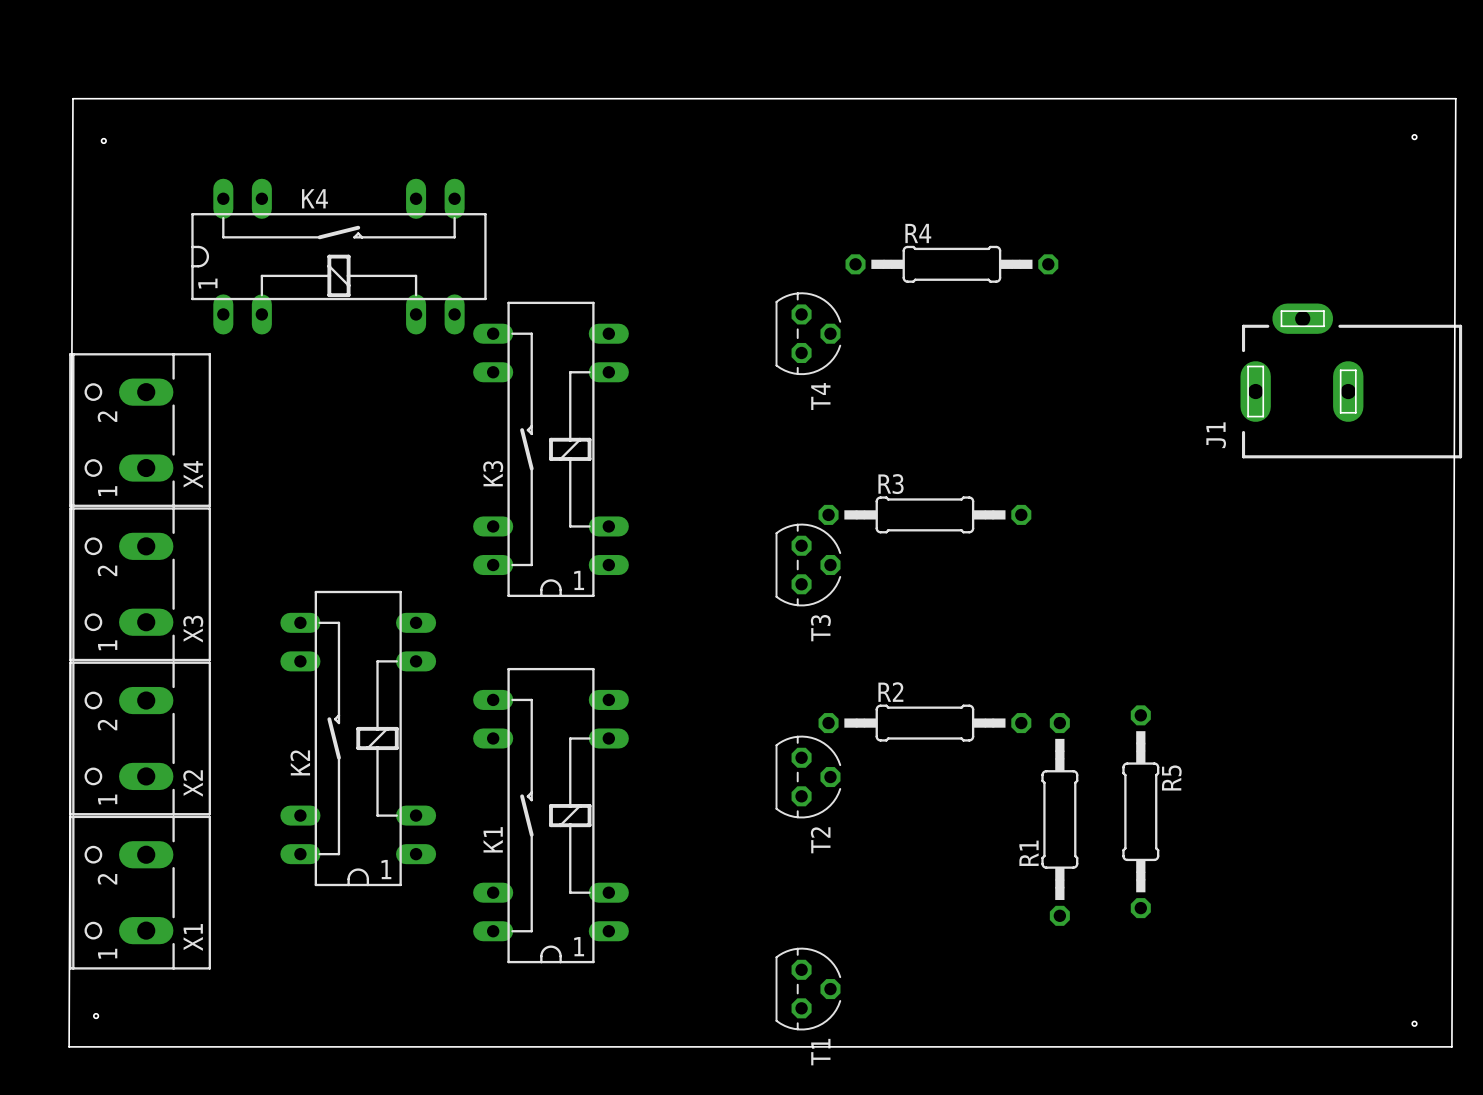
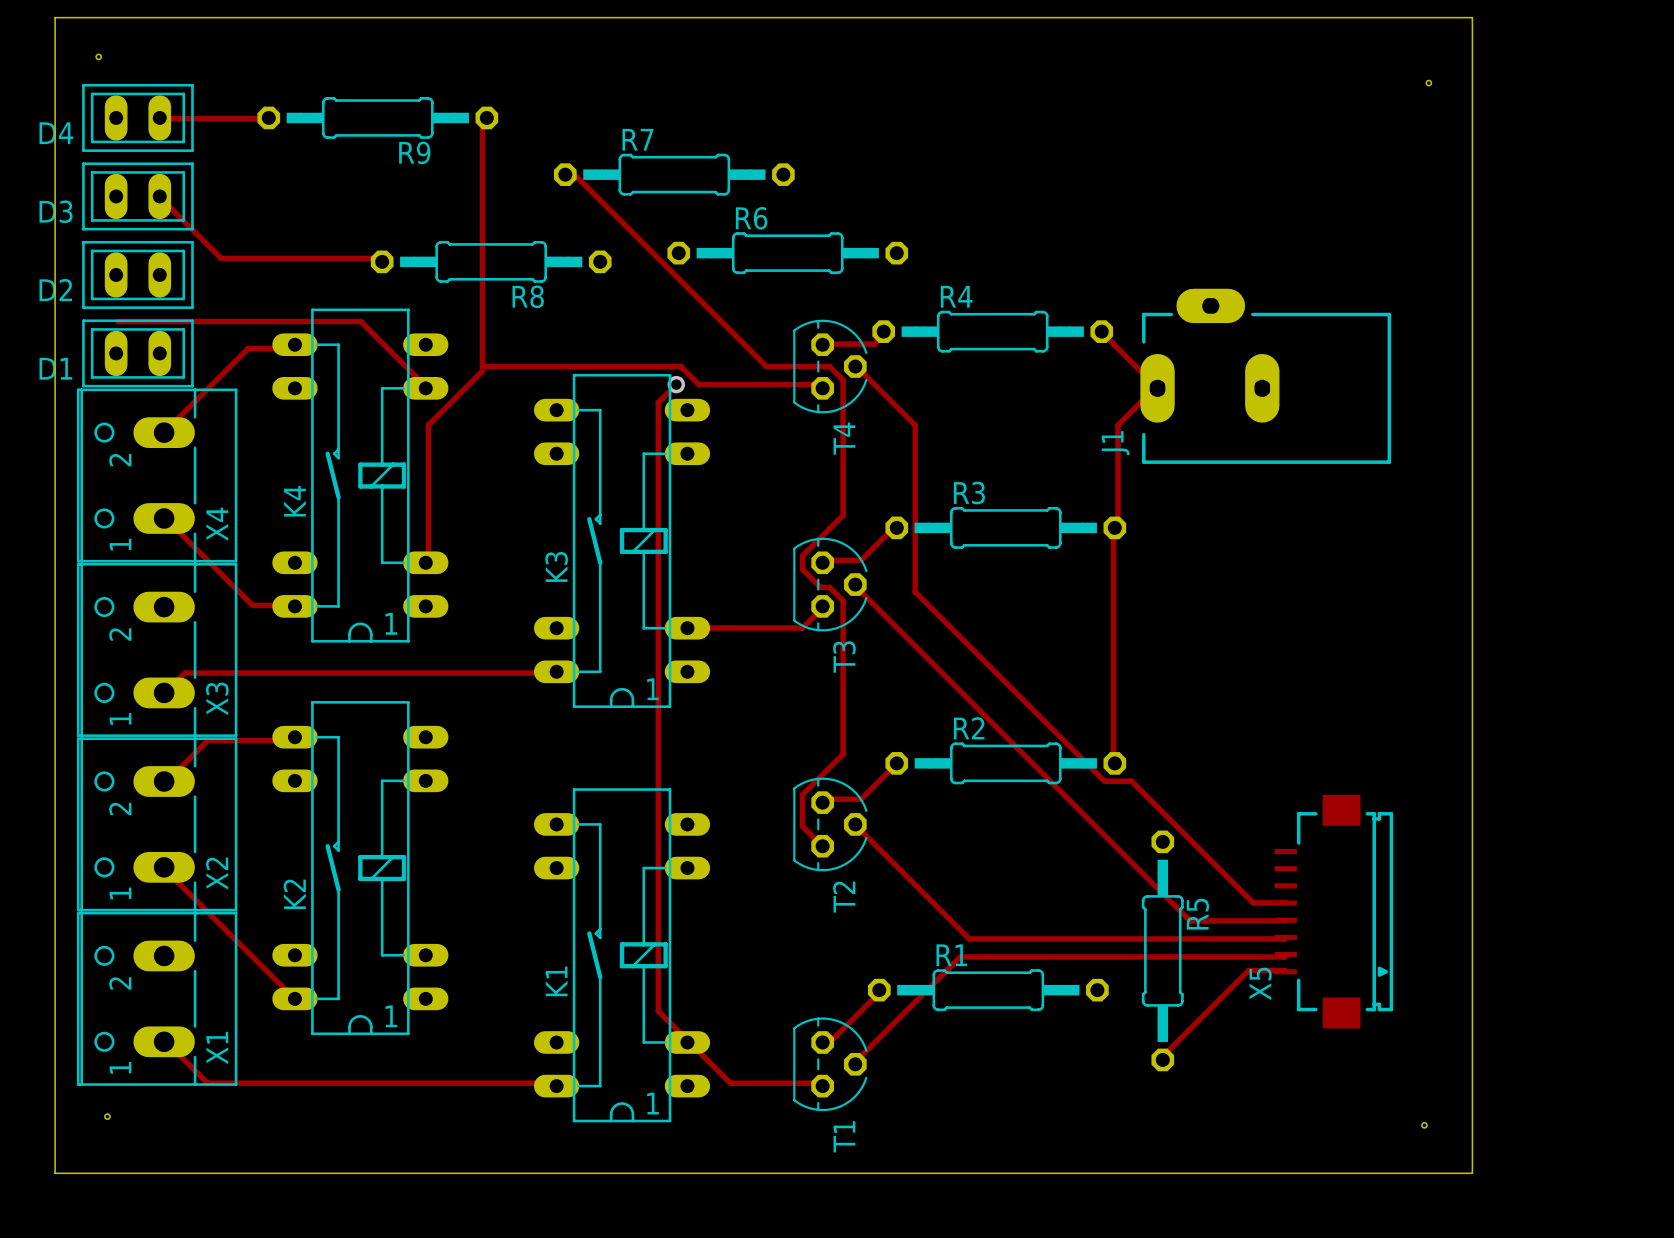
D4: none -> (137, 117)
track: none -> (159, 117) (268, 117)
R9: none -> (377, 117)
track: none -> (486, 117) (482, 118) (482, 371) (428, 425) (428, 560) (425, 562)
hole position: (1414, 137) -> (1428, 83)
hole position: (103, 140) -> (98, 56)
track: none -> (565, 174) (568, 177) (577, 177) (766, 366) (829, 366) (843, 380) (843, 515) (802, 555) (802, 569) (820, 587) (829, 587) (843, 600) (843, 754) (802, 794) (802, 826) (822, 846)
R7: none -> (674, 174)
K4 footprint: [191, 178, 487, 335] -> [272, 308, 449, 643]
D3: none -> (137, 196)
track: none -> (159, 196) (221, 258) (378, 258) (382, 261)
K4 name position: K4 (314, 198) -> K4 (294, 501)
R6: none -> (787, 253)
R8: none -> (491, 261)
D2: none -> (137, 274)
R4 position: (951, 264) -> (992, 331)
track: none -> (117, 321) (360, 321) (425, 388)
track: none -> (883, 331) (883, 335) (874, 344) (822, 344)
track: none -> (1101, 331) (1157, 388) (1154, 389) (1118, 425) (1118, 524) (1113, 528) (1114, 763)
track: none -> (294, 344) (293, 348) (248, 348) (164, 432)
D1: none -> (137, 353)
track: none -> (482, 366) (680, 366) (698, 384) (820, 384) (822, 388)
track: none -> (855, 366) (915, 425) (915, 591) (1104, 781) (1131, 781) (1253, 902) (1285, 903)
T4 position: (808, 333) -> (830, 366)
track: none -> (676, 384) (658, 402) (658, 1011) (687, 1042) (689, 1042) (730, 1083) (820, 1083) (822, 1086)
via: none -> (676, 384)
J1 position: (1351, 380) -> (1265, 376)
K3 position: (550, 449) -> (622, 540)
track: none -> (164, 518) (252, 605) (294, 606)
track: none -> (896, 527) (892, 528) (861, 560) (825, 560) (822, 562)
R3 position: (924, 514) -> (1005, 527)
track: none -> (855, 584) (1190, 920) (1285, 920)
track: none -> (822, 606) (802, 627) (687, 628)
T3 position: (808, 564) -> (830, 584)
track: none -> (556, 671) (185, 673) (164, 692)
track: none -> (294, 737) (293, 740) (207, 740) (167, 781) (164, 781)
track: none -> (896, 763) (861, 799) (825, 799) (822, 802)
R2 position: (924, 723) -> (1005, 763)
K2 position: (358, 738) -> (360, 868)
track: none -> (855, 824) (969, 938) (1284, 938) (1285, 937)
track: none -> (164, 867) (294, 998)
T2 position: (808, 777) -> (830, 824)
R5 position: (1140, 811) -> (1162, 950)
K1 position: (550, 815) -> (622, 955)
X5: none -> (1333, 911)
R1 rotation: 0° (1059, 819) -> 90° clockwise (988, 990)
R1 position: (1059, 819) -> (988, 990)
track: none -> (1285, 954) (1284, 956) (960, 956) (856, 1060) (855, 1064)
track: none -> (1285, 971) (1248, 970) (1163, 1056) (1162, 1059)
track: none -> (879, 990) (879, 993) (834, 1038) (825, 1038) (822, 1042)
track: none -> (164, 1041) (207, 1083) (554, 1083) (556, 1086)
T1 position: (808, 989) -> (830, 1064)
hole position: (96, 1016) -> (107, 1116)
hole position: (1414, 1023) -> (1424, 1125)
board edge: (69, 1046) (72, 98) (1455, 98) (1451, 1046) (1302, 1046) -> (76, 1173) (55, 1173) (55, 17) (1472, 17) (1472, 1173)

